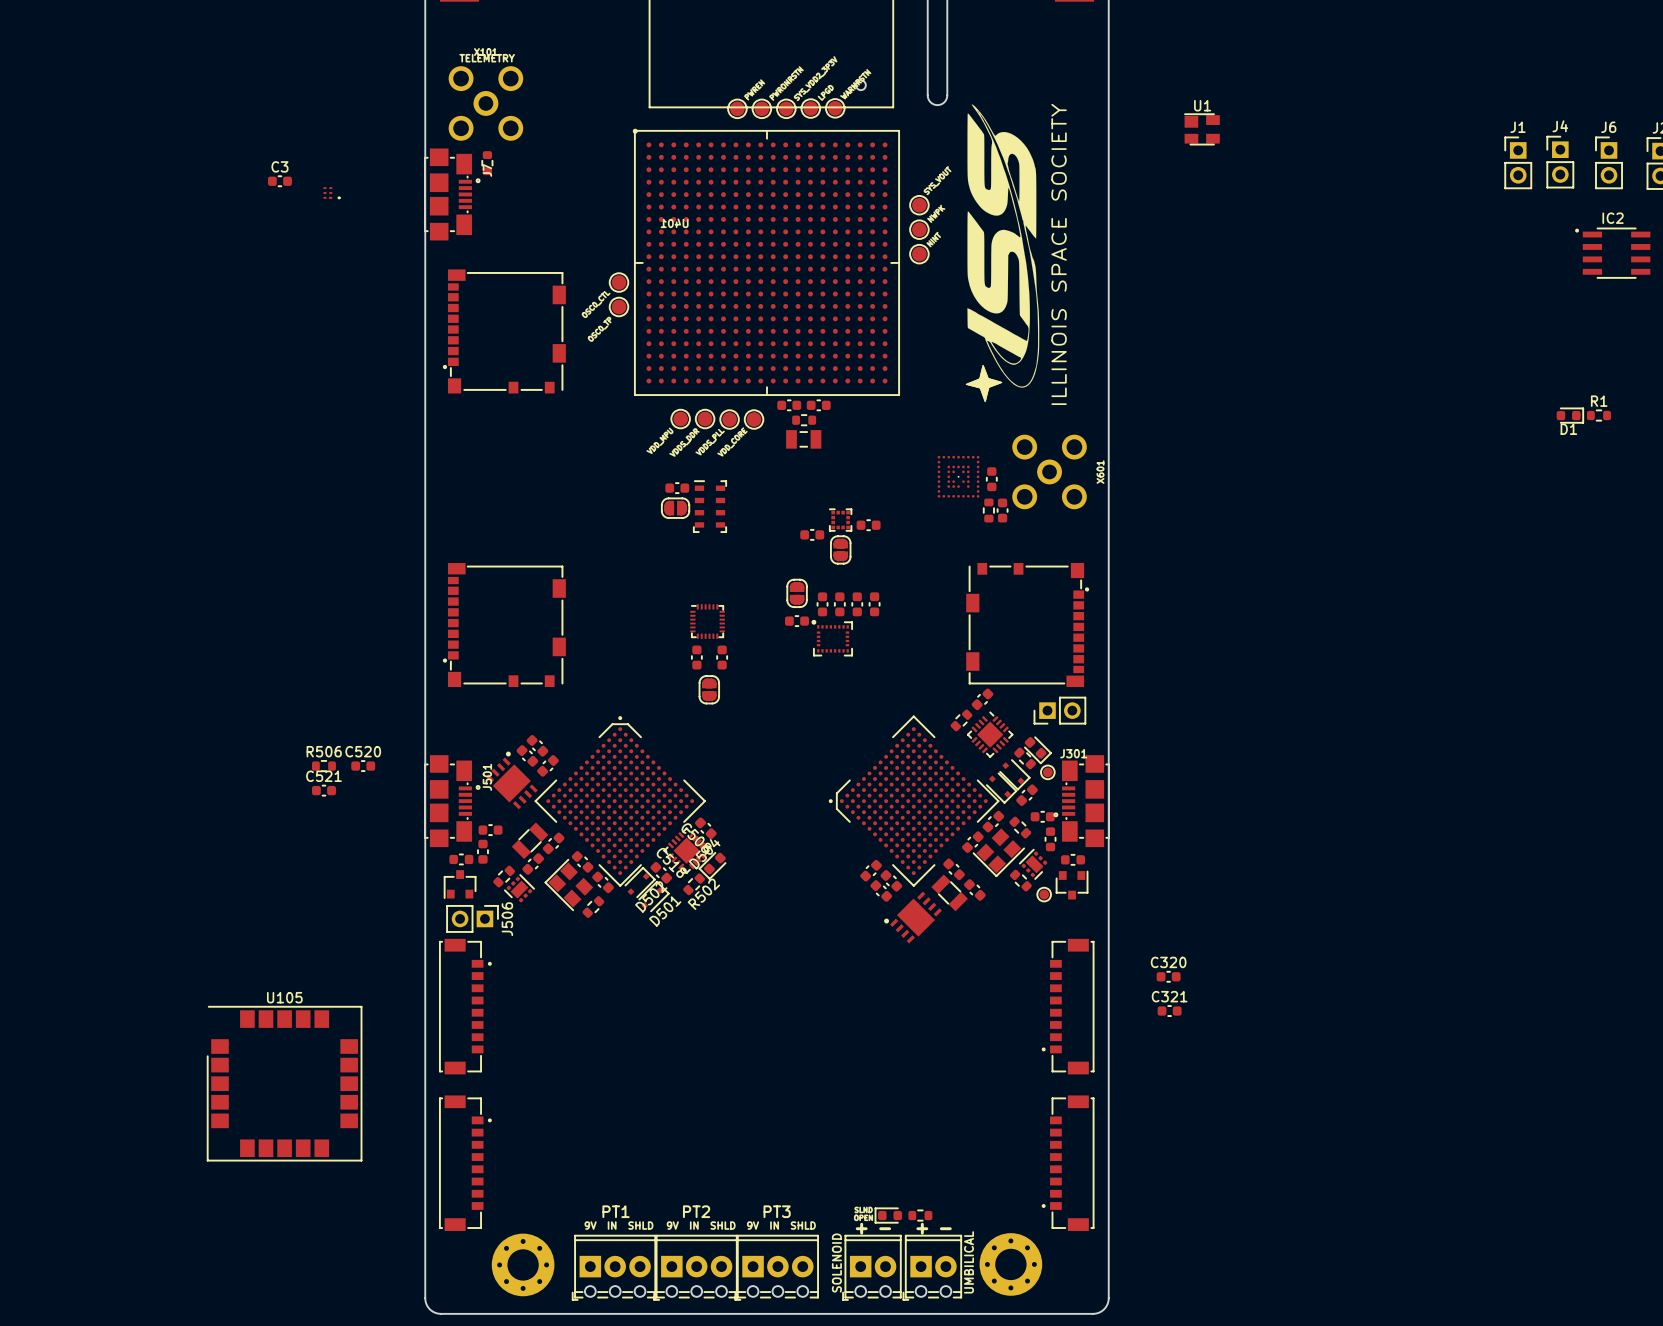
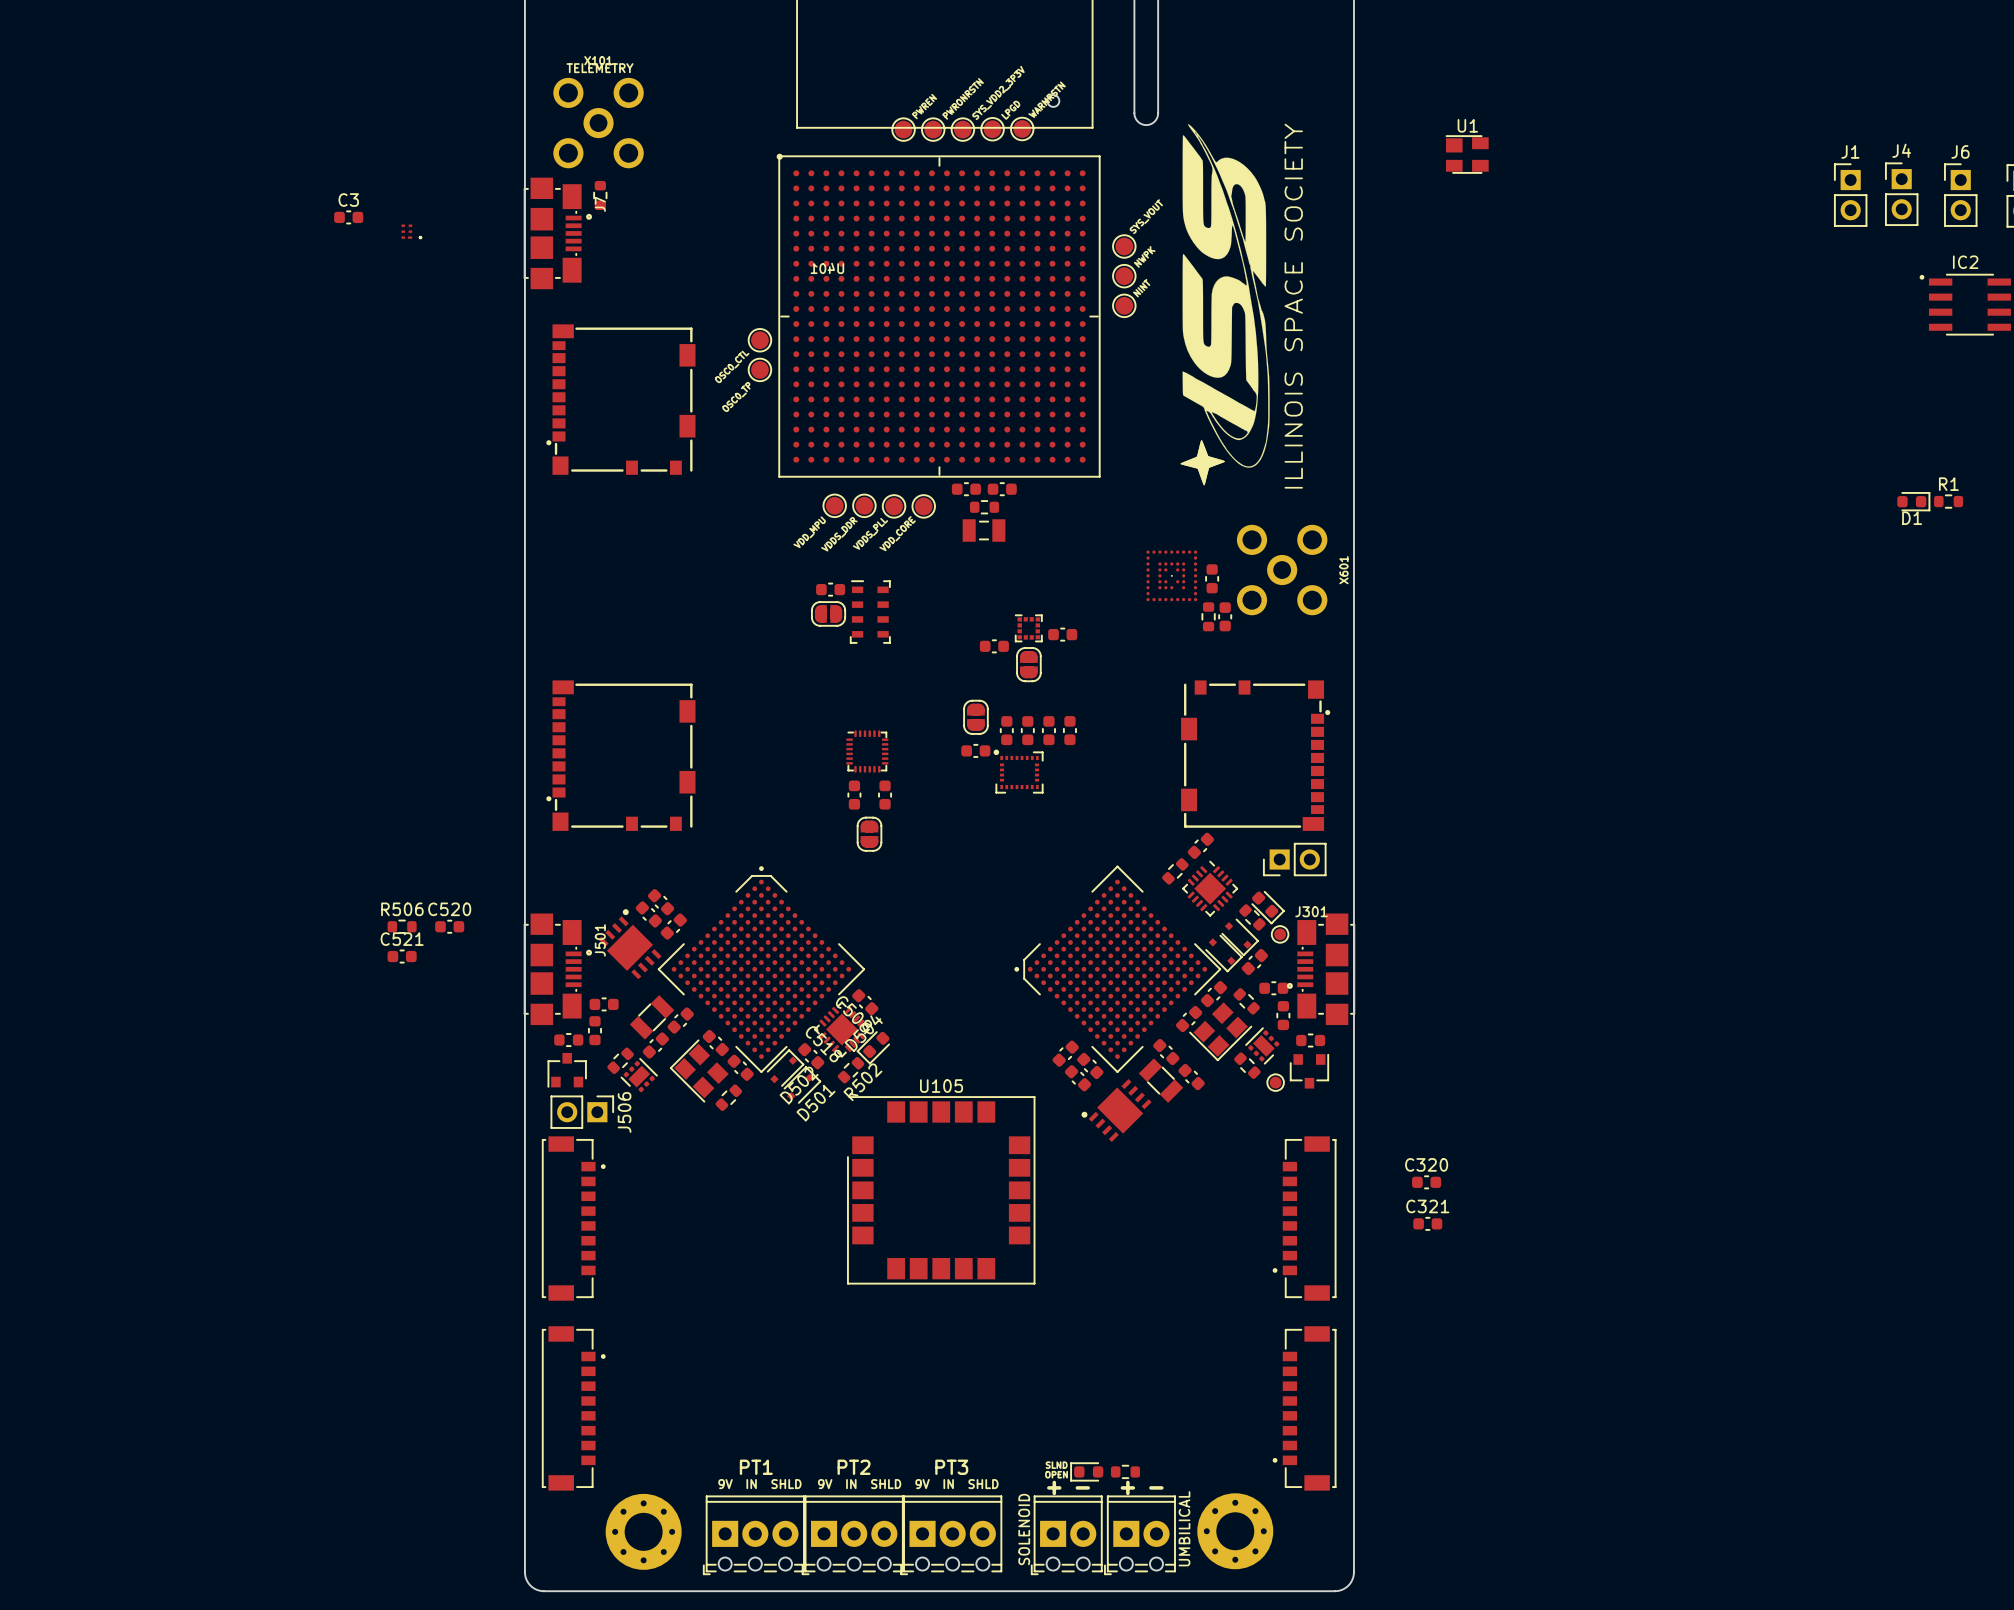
U105 position: (284, 1083) -> (941, 1190)

